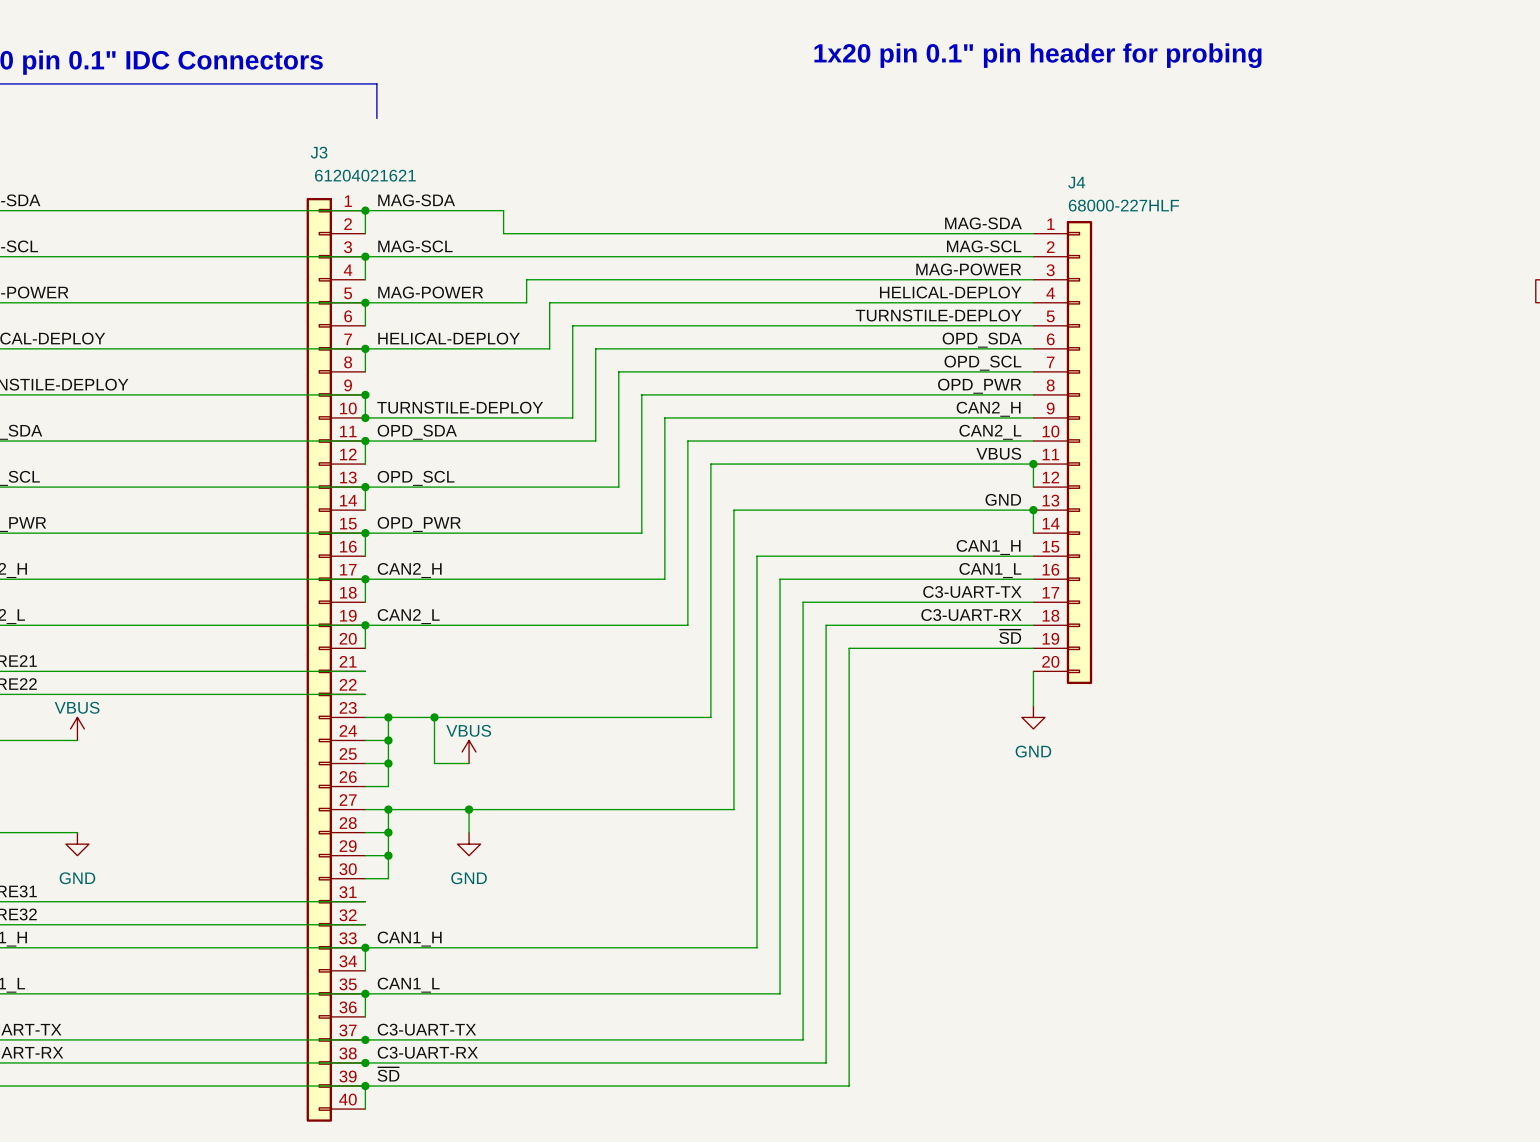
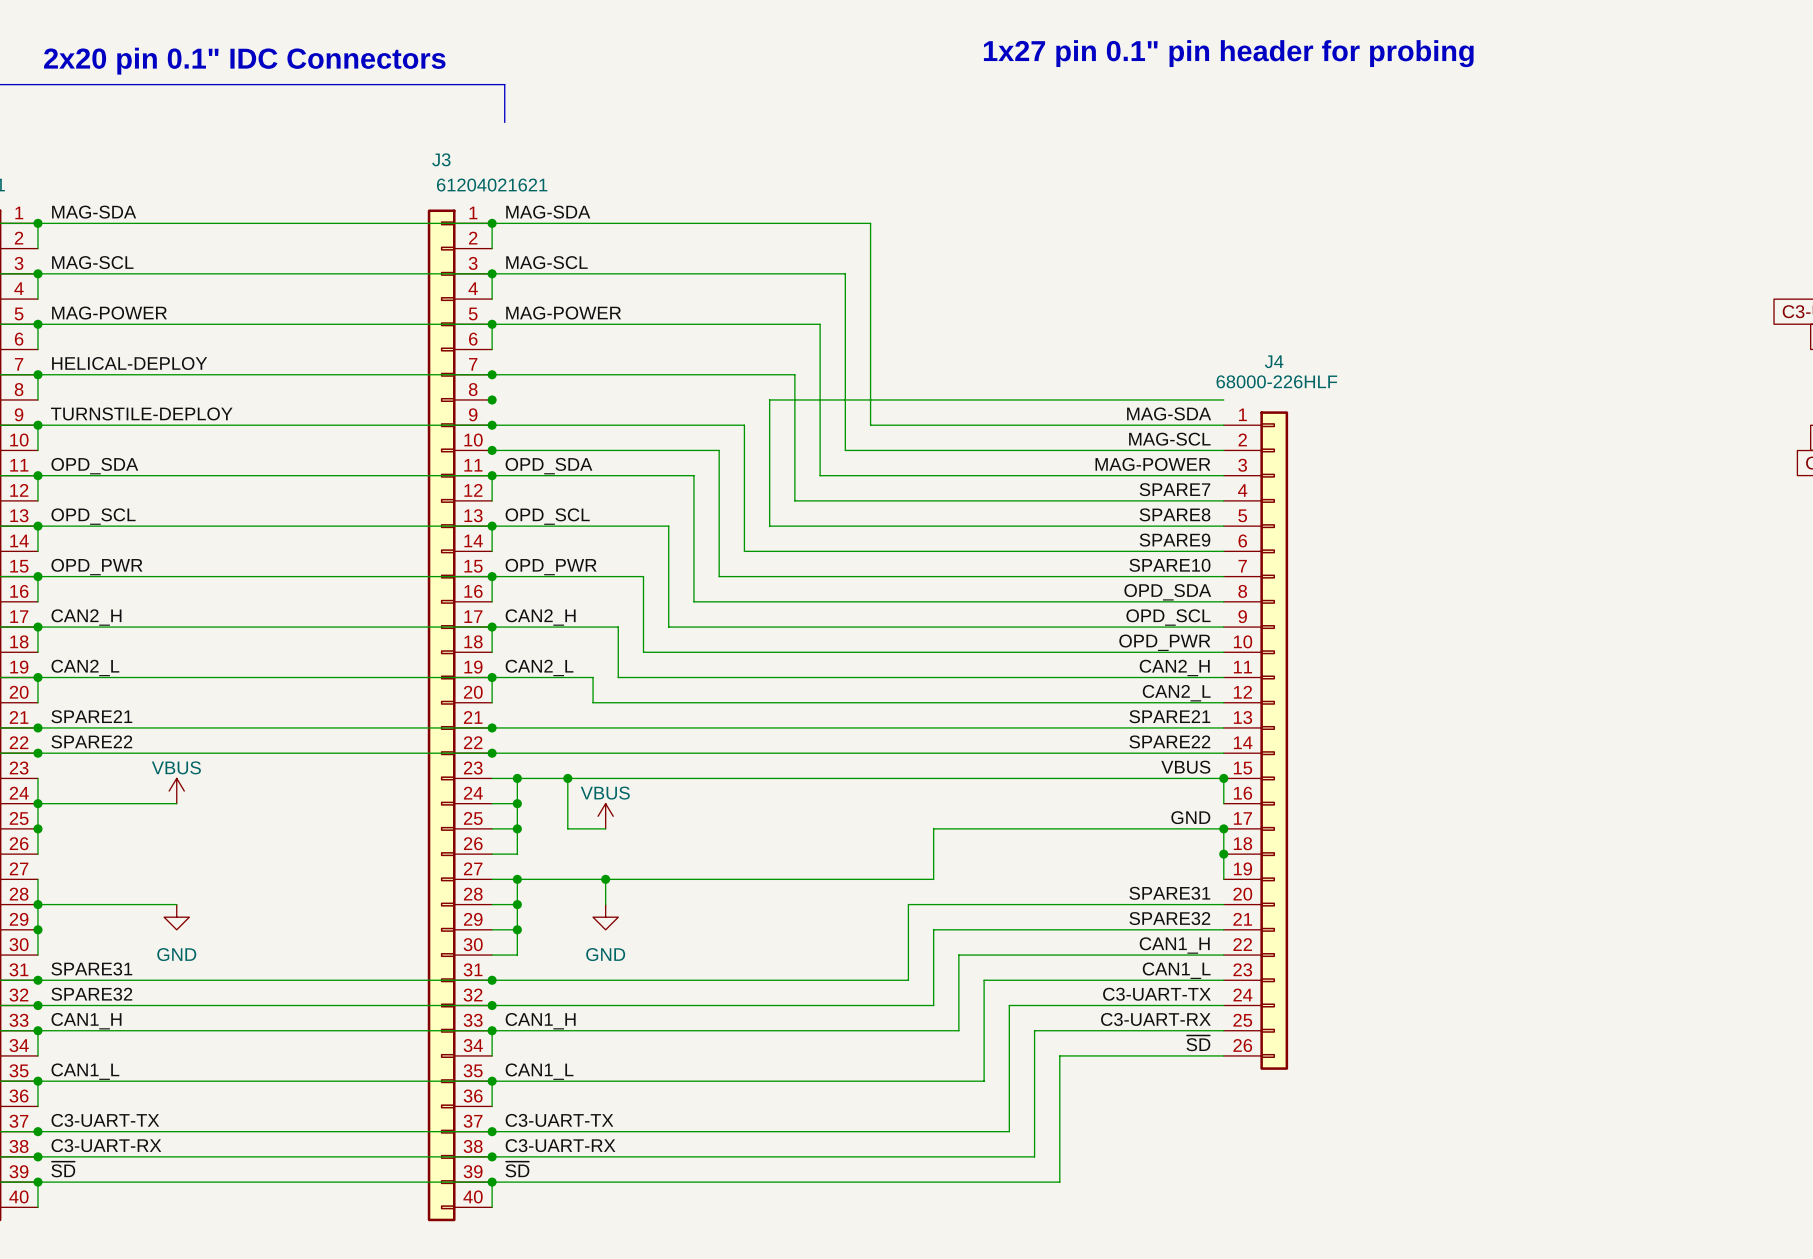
text: 1x20 pin 0.1" pin header for probing (1037, 55) -> 1x27 pin 0.1" pin header for probing (1228, 53)
J4 name position: J4 (1076, 182) -> J4 (1274, 361)
J4 value: 68000-227HLF (1123, 205) -> 68000-226HLF (1276, 381)
wire: (503, 210) (503, 233) (1033, 233) -> (643, 223) (870, 223) (870, 425)
J4 symbol: [1033, 221, 1093, 685] -> [1223, 411, 1289, 1070]
label: MAG-SDA (983, 223) -> none
label: MAG-SCL (984, 246) -> none
wire: (687, 256) (1033, 256) -> (845, 273) (845, 450)
label: MAG-POWER (968, 269) -> none
wire: (1033, 279) (526, 279) (526, 302) -> none
label: HELICAL-DEPLOY (950, 292) -> none
wire: (549, 302) (549, 348) -> (693, 324) (668, 324)
wire: (664, 302) (1033, 302) -> none
label: TURNSTILE-DEPLOY (938, 315) -> none
wire: (1033, 325) (572, 325) (572, 417) -> none
label: HELICAL-DEPLOY (449, 338) -> none
label: OPD_SDA (982, 340) -> none
wire: (365, 348) (365, 371) -> none
wire: (595, 348) (595, 394) -> (744, 374) (693, 374)
wire: (641, 348) (1033, 348) -> none
label: OPD_SCL (982, 363) -> none
junction: none -> (492, 399)
label: OPD_PWR (979, 386) -> MAG-SDA (1169, 413)
wire: (365, 394) (365, 417) -> (492, 425) (744, 425)
wire: (641, 394) (710, 394) -> (794, 425) (794, 374)
label: TURNSTILE-DEPLOY (460, 407) -> none
label: CAN2_H (988, 409) -> MAG-SCL (1169, 439)
wire: (664, 417) (687, 417) -> (820, 450) (820, 324)
label: CAN2_L (990, 432) -> MAG-POWER (1152, 464)
wire: (549, 441) (595, 441) -> (895, 551) (744, 551) (744, 475)
wire: none -> (693, 475) (693, 601) (921, 601)
wire: (664, 441) (664, 579) -> (820, 475) (845, 475)
wire: (687, 441) (687, 625) -> (996, 677) (845, 677)
label: VBUS (998, 453) -> SPARE7 (1174, 489)
wire: (641, 464) (641, 533) -> (794, 500) (870, 500)
wire: (710, 464) (710, 717) -> (1223, 803) (1223, 778) (870, 778)
wire: (1033, 464) (1033, 487) -> (769, 526) (1223, 526)
junction: (1033, 464) -> none
label: none -> SPARE8 (1175, 514)
wire: (526, 487) (618, 487) -> none
label: GND (1003, 499) -> SPARE9 (1174, 540)
wire: (733, 510) (733, 809) -> (1223, 879) (1223, 828) (933, 828) (933, 879) (895, 879)
wire: (1033, 510) (1033, 533) -> (794, 576) (1223, 576)
junction: (1033, 510) -> none
label: none -> SPARE10 (1169, 565)
wire: (503, 533) (572, 533) -> (719, 450) (719, 576)
wire: none -> (643, 576) (643, 652) (971, 652)
label: CAN1_H (988, 547) -> OPD_SDA (1167, 592)
wire: (756, 556) (756, 947) -> (1223, 955) (958, 955) (958, 1030) (921, 1030)
label: CAN1_L (990, 570) -> OPD_SCL (1168, 617)
wire: (480, 579) (526, 579) -> (668, 526) (668, 627)
wire: none -> (820, 627) (946, 627)
wire: (780, 579) (780, 993) -> (1223, 980) (984, 980) (984, 1081) (946, 1081)
label: C3-UART-TX (972, 591) -> OPD_PWR (1164, 642)
wire: (803, 602) (803, 1039) -> (1223, 1005) (1009, 1005) (1009, 1131) (971, 1131)
label: C3-UART-RX (971, 615) -> CAN2_H (1174, 667)
wire: (457, 625) (480, 625) -> (618, 627) (618, 677)
wire: none -> (593, 677) (593, 702) (1021, 702)
wire: (826, 625) (826, 1062) -> (1223, 1030) (1034, 1030) (1034, 1156) (996, 1156)
label: ~{SD} (1010, 636) -> CAN2_L (1176, 693)
wire: (849, 648) (849, 1086) -> (1223, 1055) (1059, 1055) (1059, 1182) (1021, 1182)
label: none -> SPARE21 (1169, 716)
junction: none -> (492, 727)
wire: (1033, 671) (1033, 705) -> (1223, 727) (492, 727)
label: none -> SPARE22 (1169, 741)
wire: none -> (492, 753) (1223, 753)
junction: none -> (492, 753)
label: none -> VBUS (1185, 767)
junction: none -> (1223, 778)
power symbol: GND (1033, 717) -> none
label: none -> GND (1190, 817)
junction: none -> (1223, 828)
junction: none -> (1223, 854)
label: none -> SPARE31 (1169, 893)
wire: none -> (1223, 904) (908, 904) (908, 980) (492, 980)
label: none -> SPARE32 (1169, 918)
wire: none -> (1223, 929) (933, 929) (933, 1005) (492, 1005)
label: none -> CAN1_H (1174, 945)
label: none -> CAN1_L (1176, 970)
junction: none -> (492, 980)
label: none -> C3-UART-TX (1156, 994)
junction: none -> (492, 1005)
label: none -> C3-UART-RX (1155, 1019)
label: none -> ~{SD} (1198, 1043)

